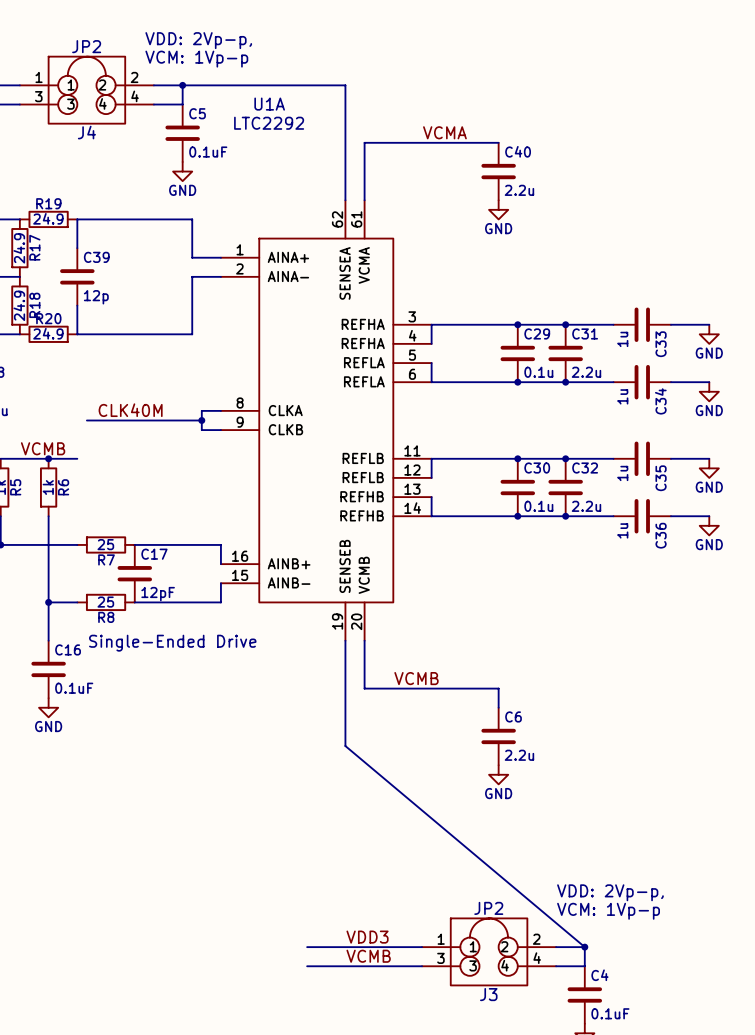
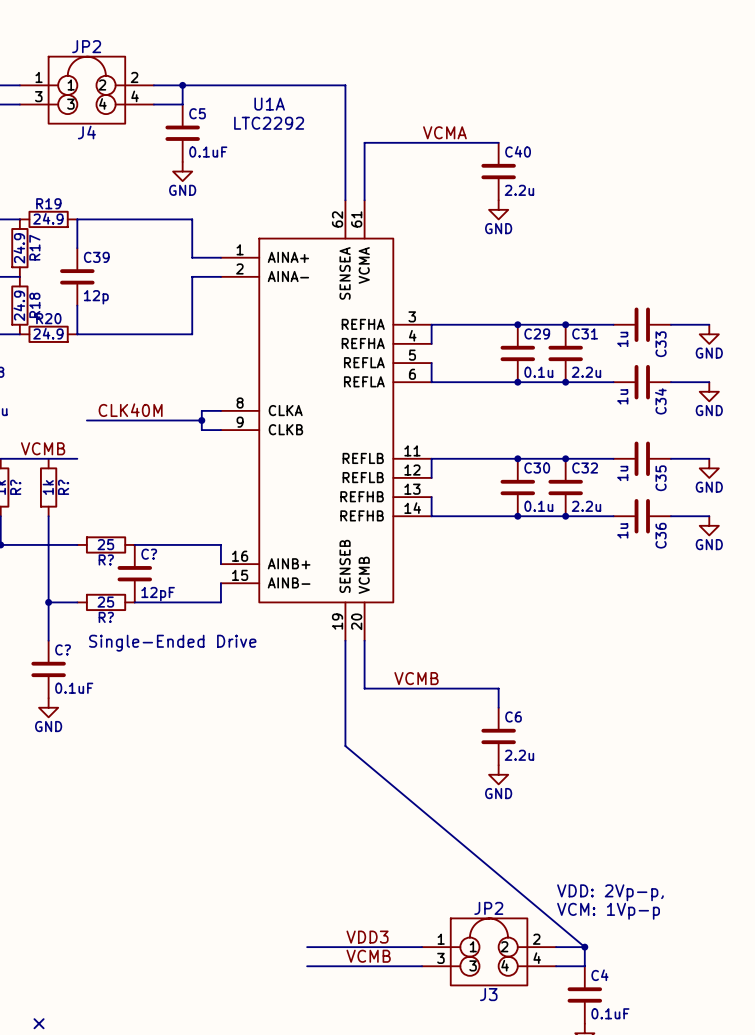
text: VDD: 2Vp-p, (198, 40) -> none
text: VCM: 1Vp-p (196, 59) -> none
junction: (48, 458) -> none
R5 name: R5 (15, 487) -> R? (15, 487)
R6 name: R6 (63, 487) -> R? (63, 487)
C17 name: C17 (154, 554) -> C? (149, 554)
R7 name: R7 (106, 559) -> R? (106, 559)
R8 name: R8 (106, 617) -> R? (106, 617)
C16 name: C16 (68, 649) -> C? (63, 649)
no-connect mark: none -> (39, 1023)

